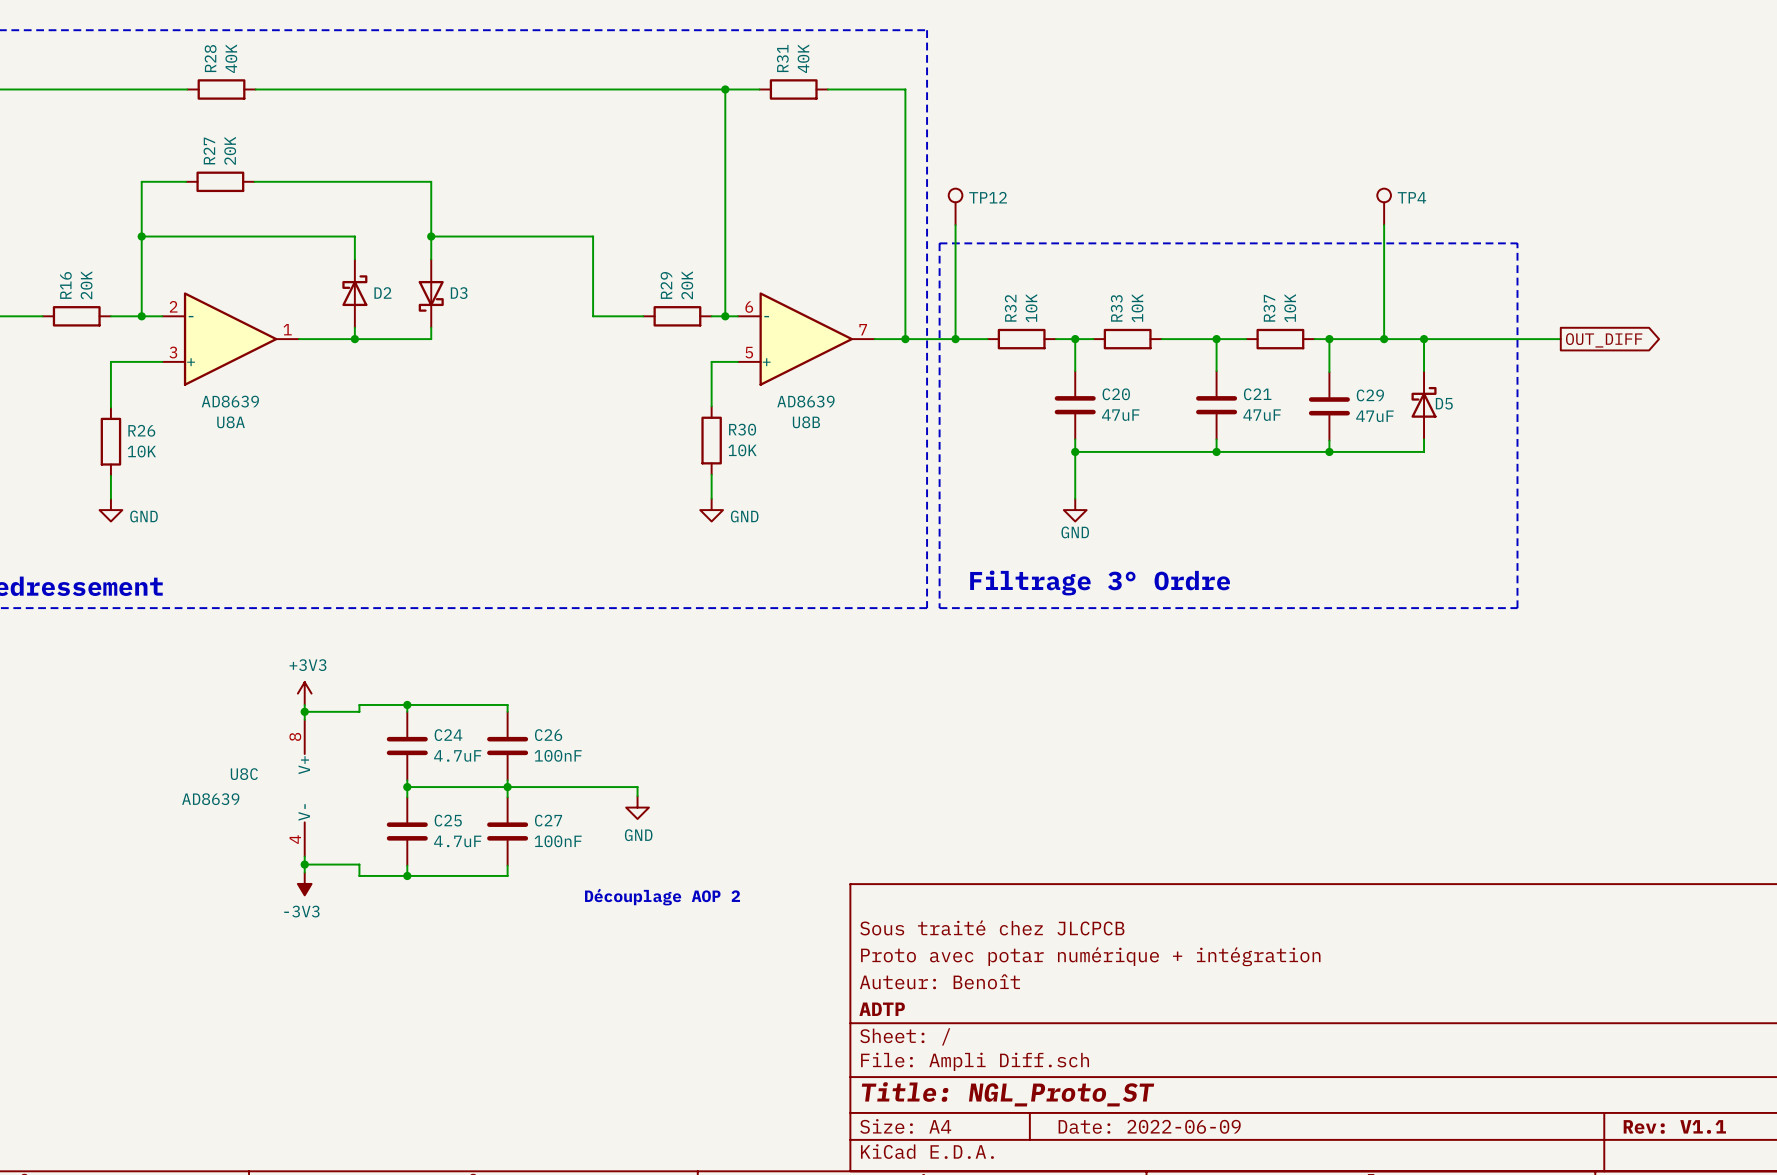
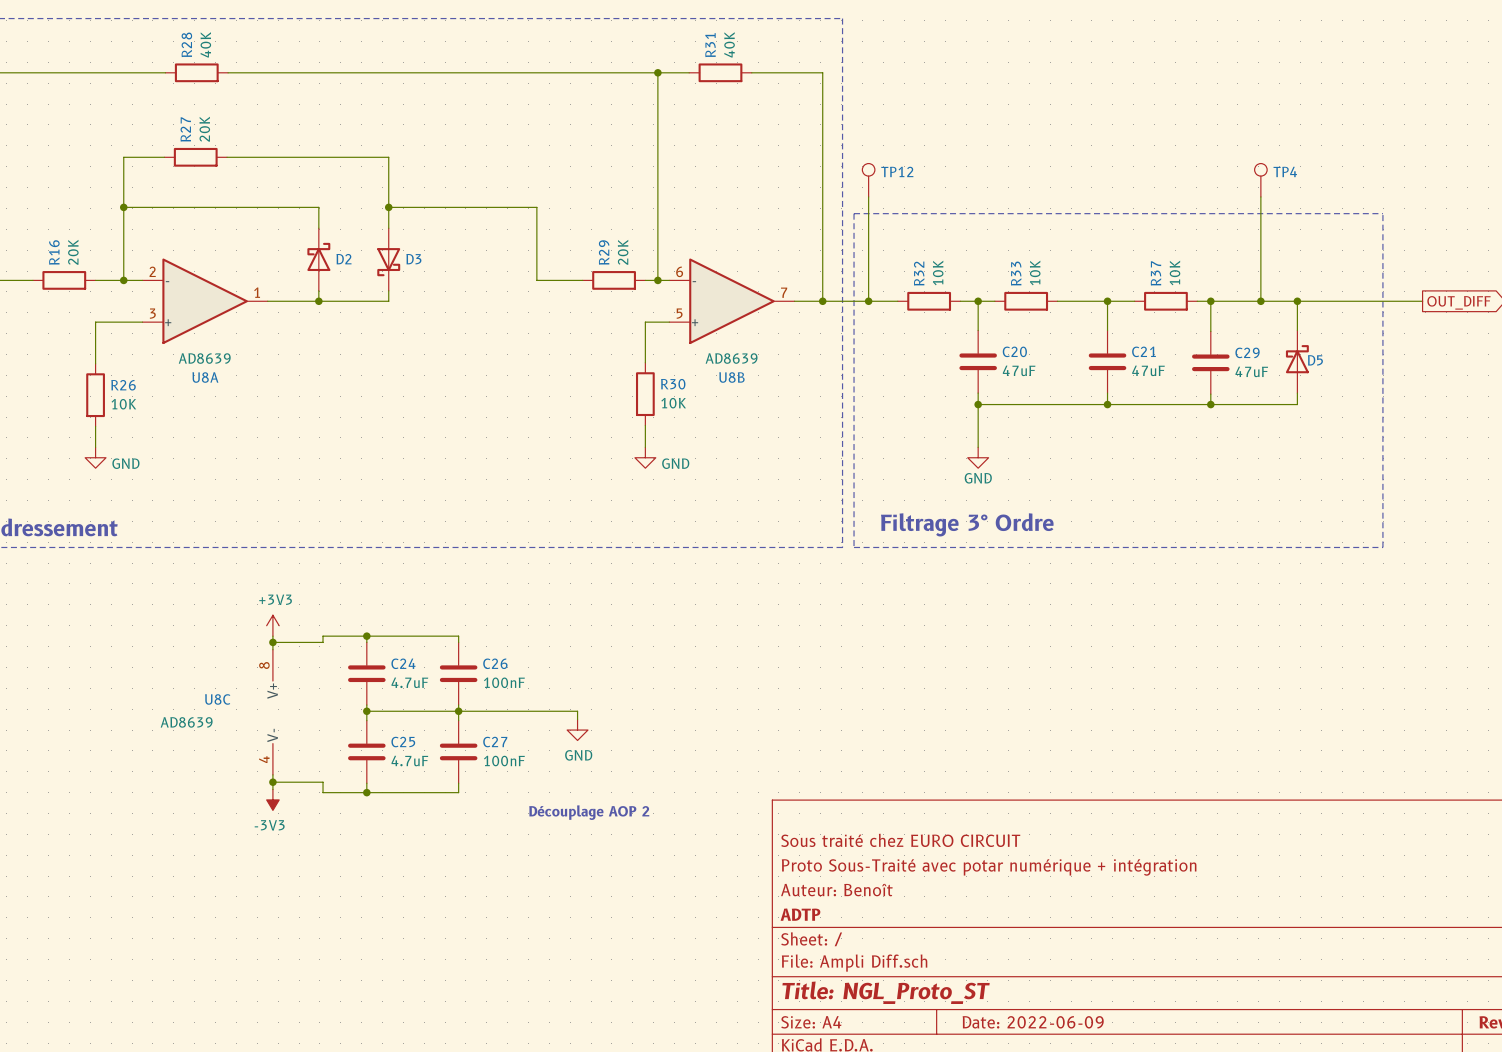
title block: Sous traité chez JLCPCB (992, 927) -> Sous traité chez EURO CIRCUIT (900, 840)
title block: Proto avec potar numérique + intégration (1090, 956) -> Proto Sous-Traité avec potar numérique + intégration (989, 867)

